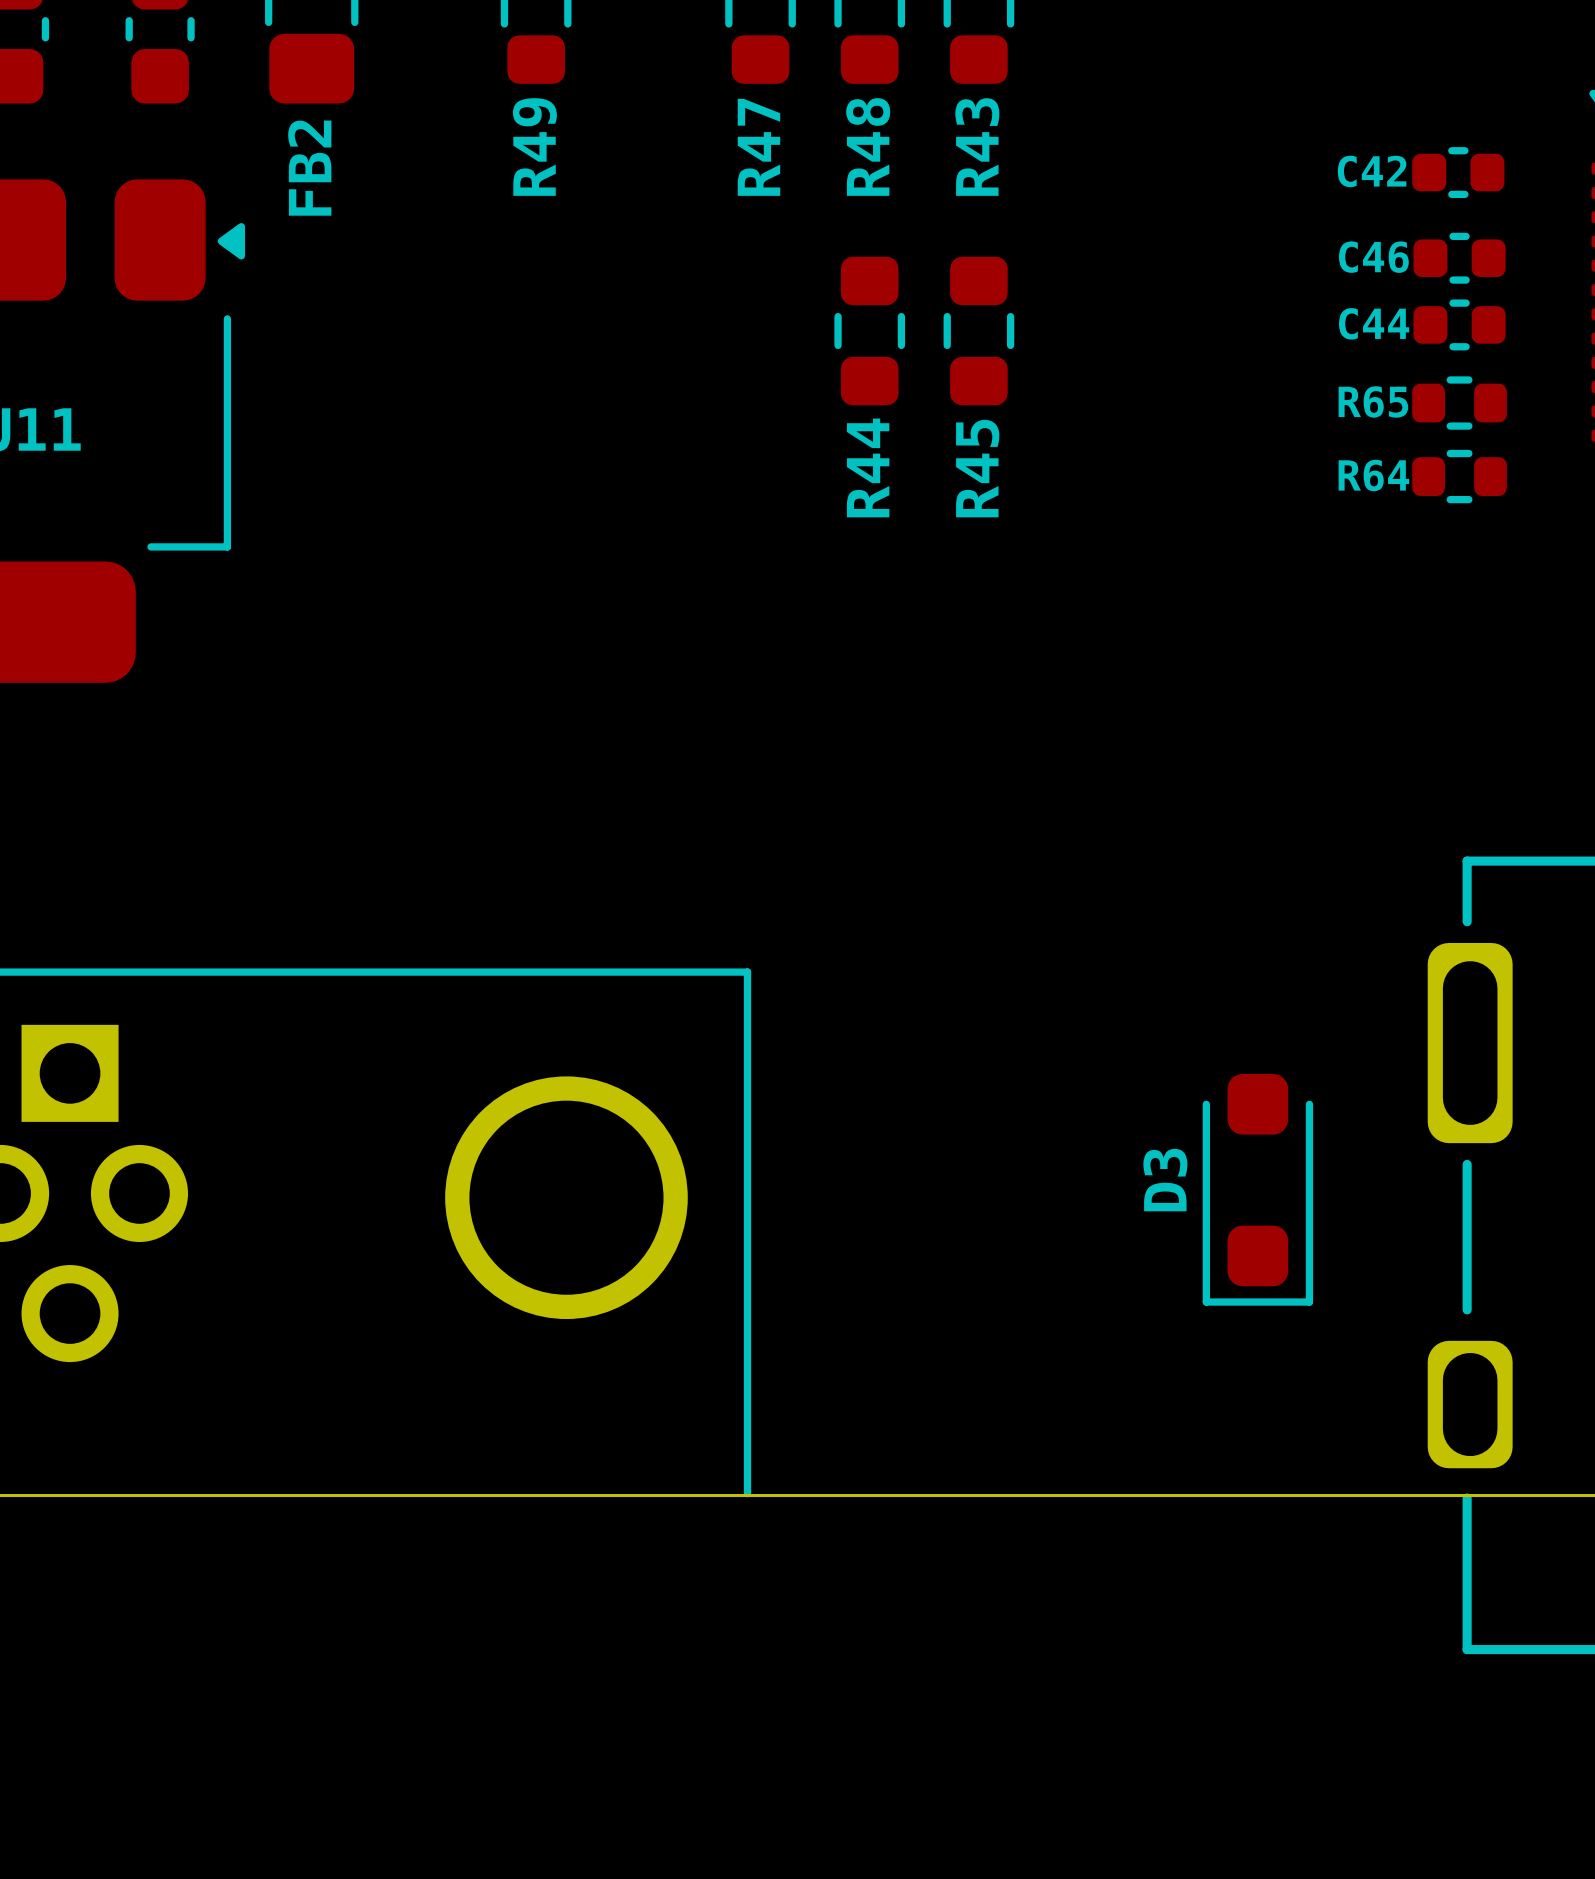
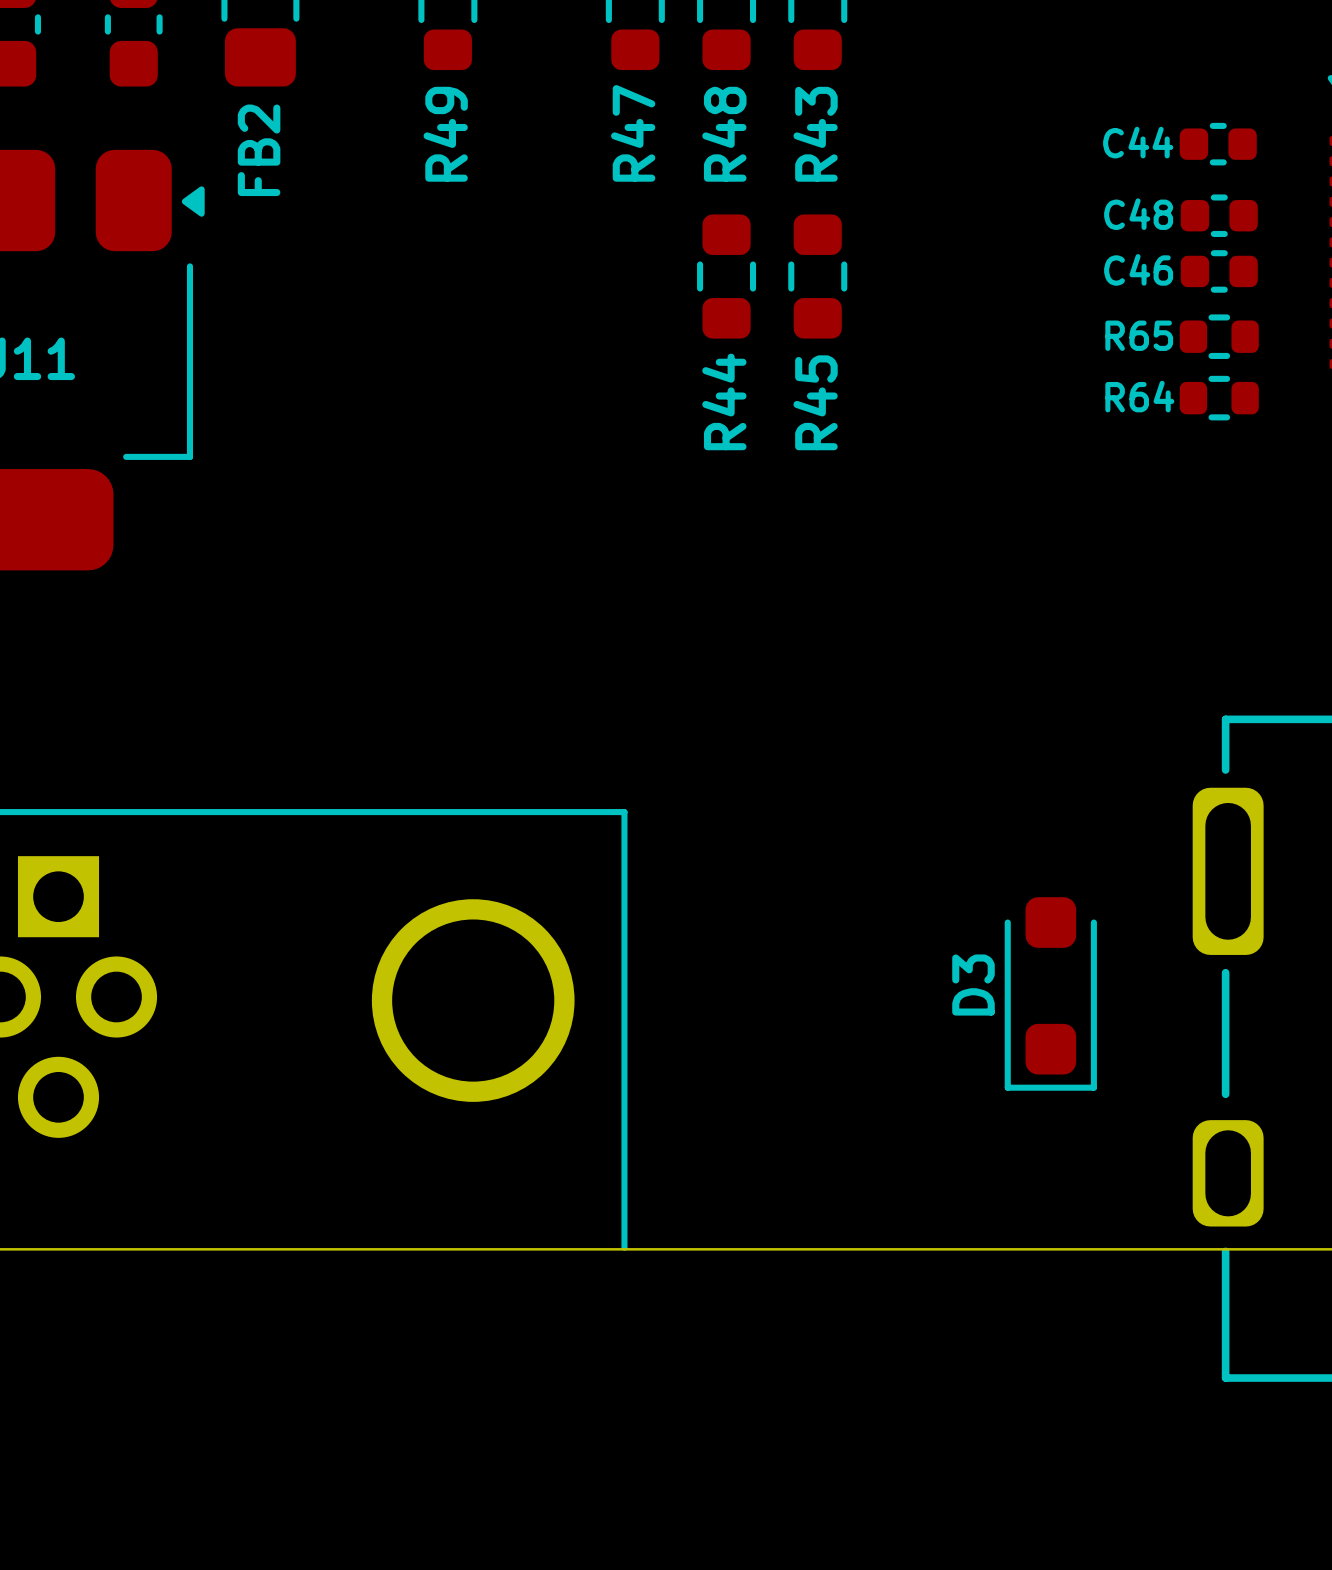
C42 name: C42 (1372, 171) -> C44 (1138, 142)
C46 name: C46 (1373, 257) -> C48 (1138, 214)
C44 name: C44 (1374, 323) -> C46 (1138, 269)

